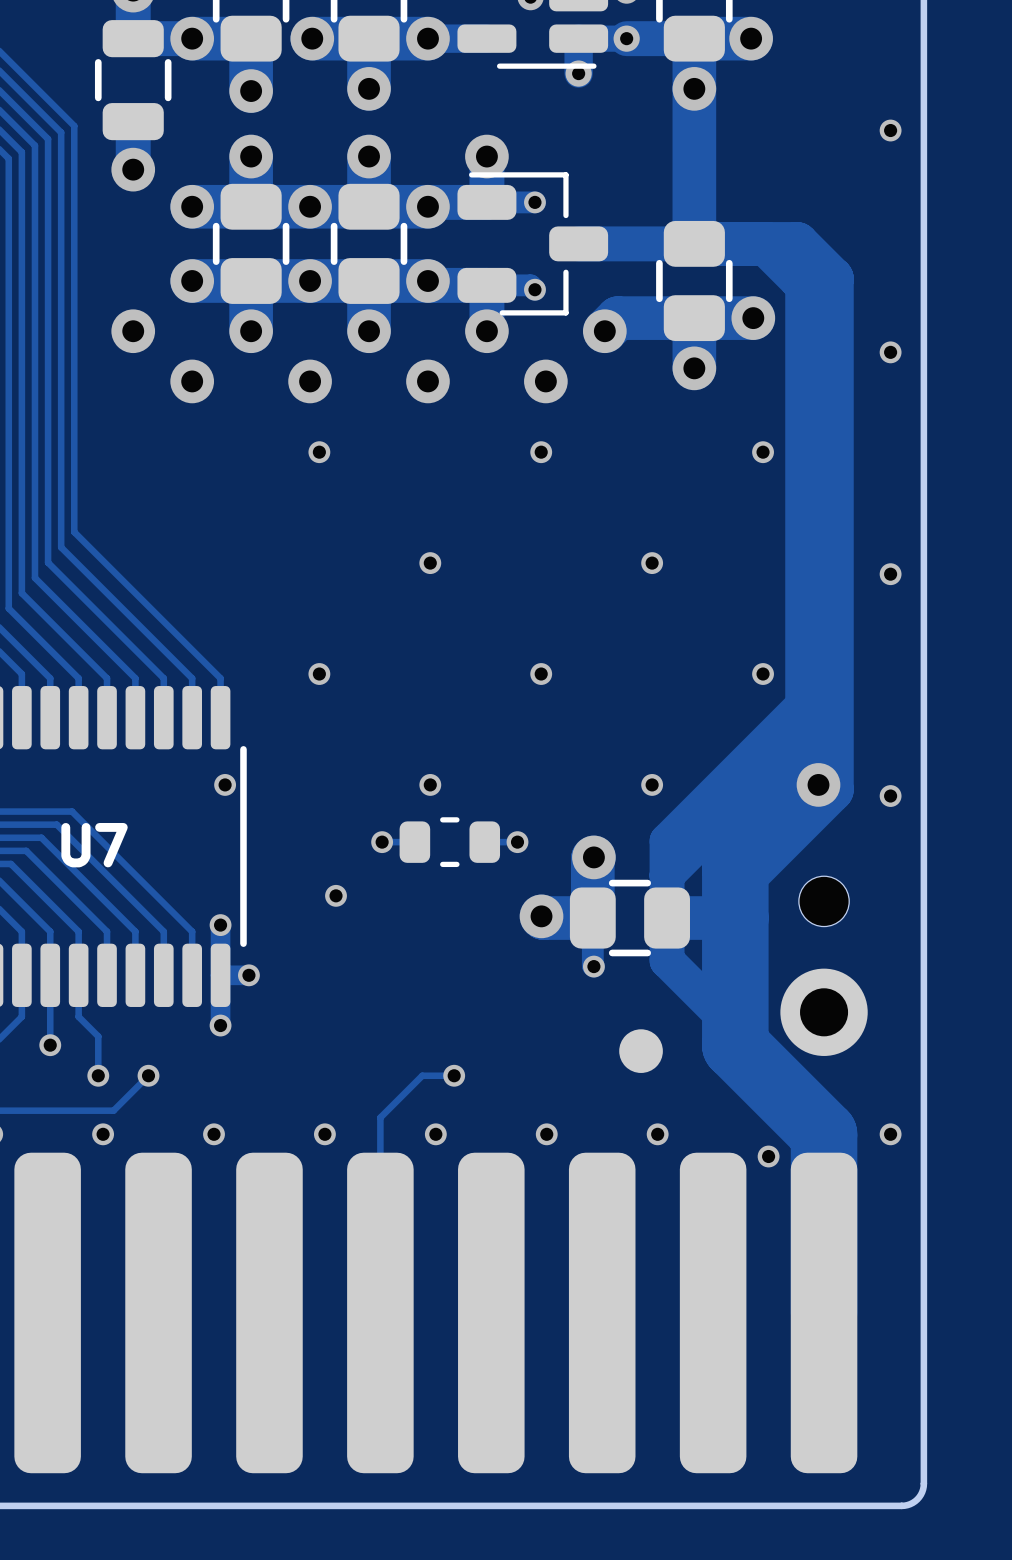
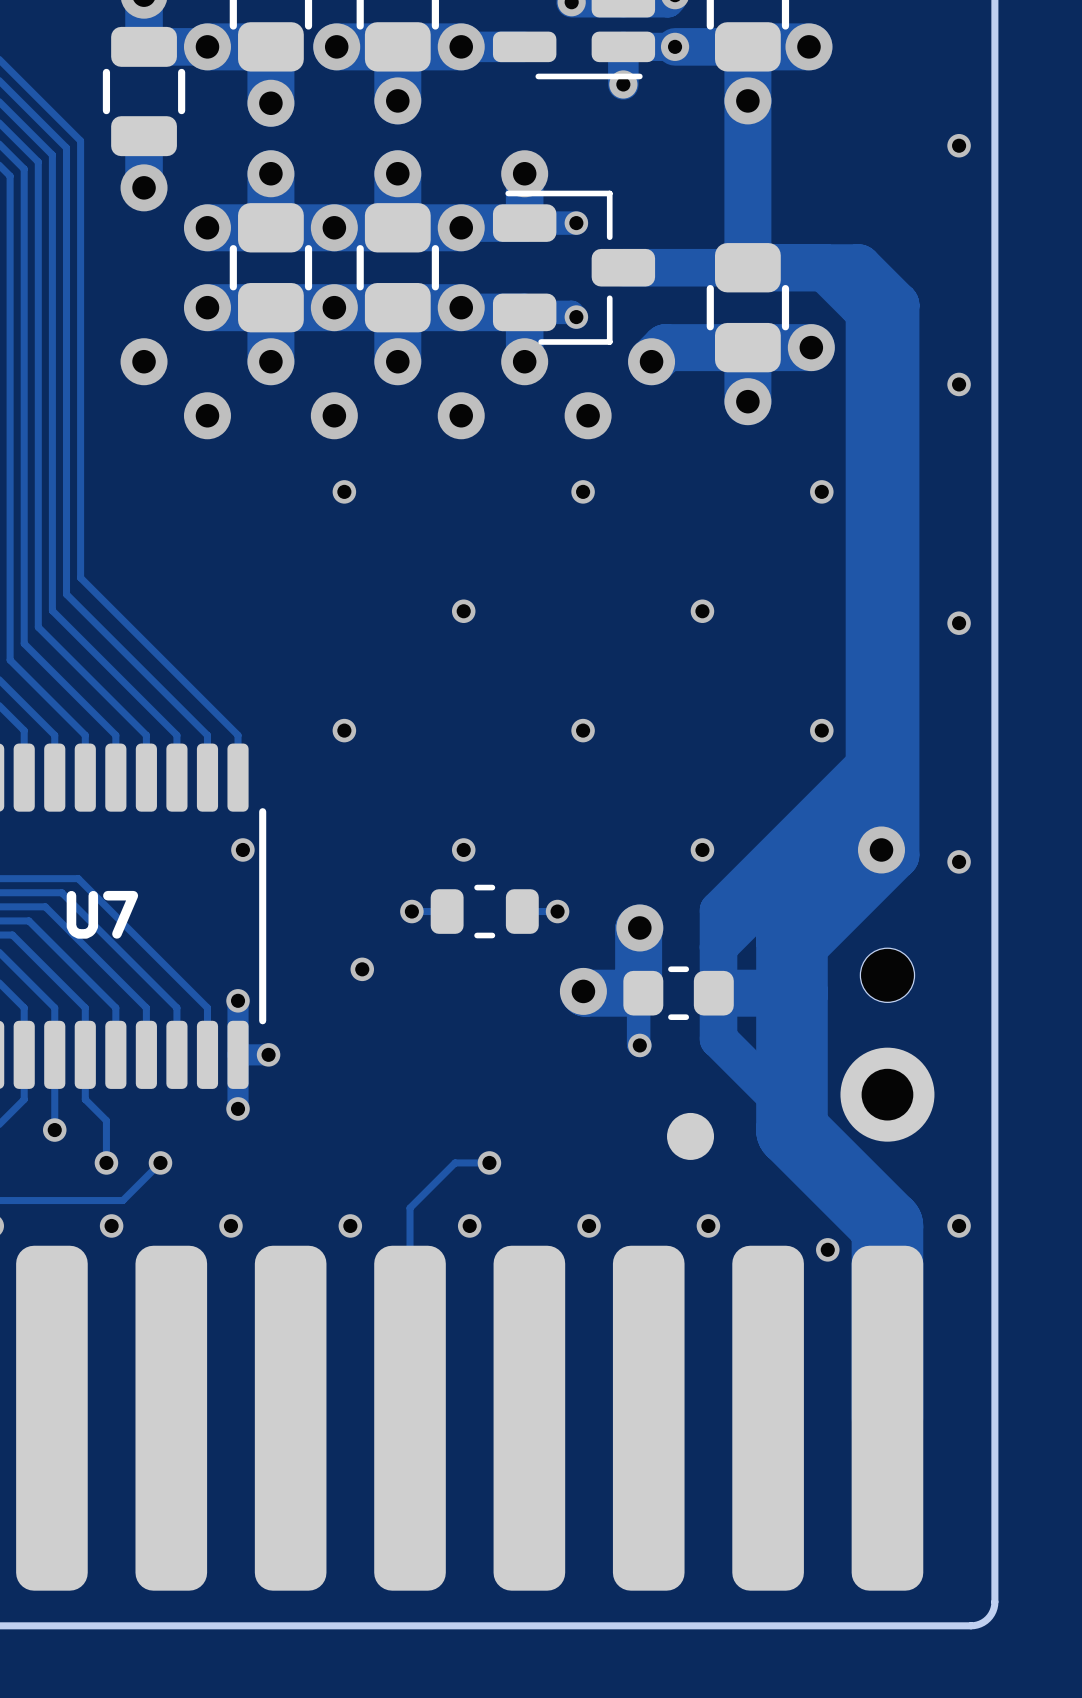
part footprint: [569, 879, 690, 957] -> [623, 966, 734, 1020]

